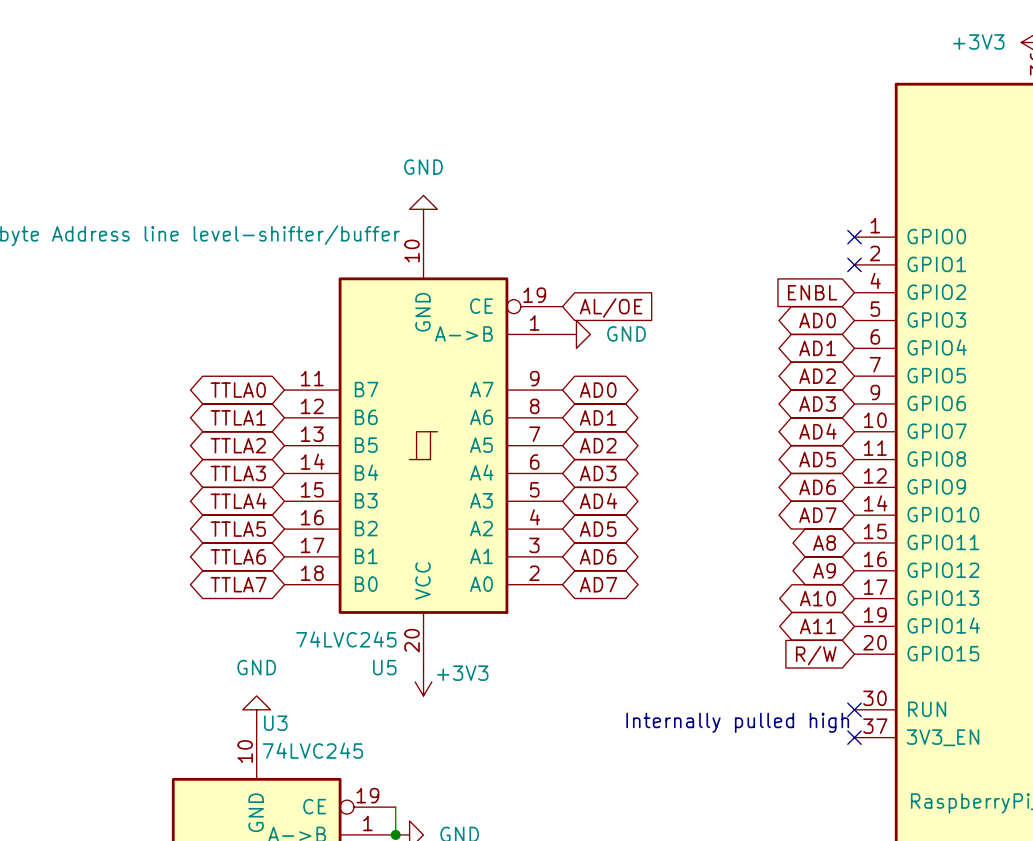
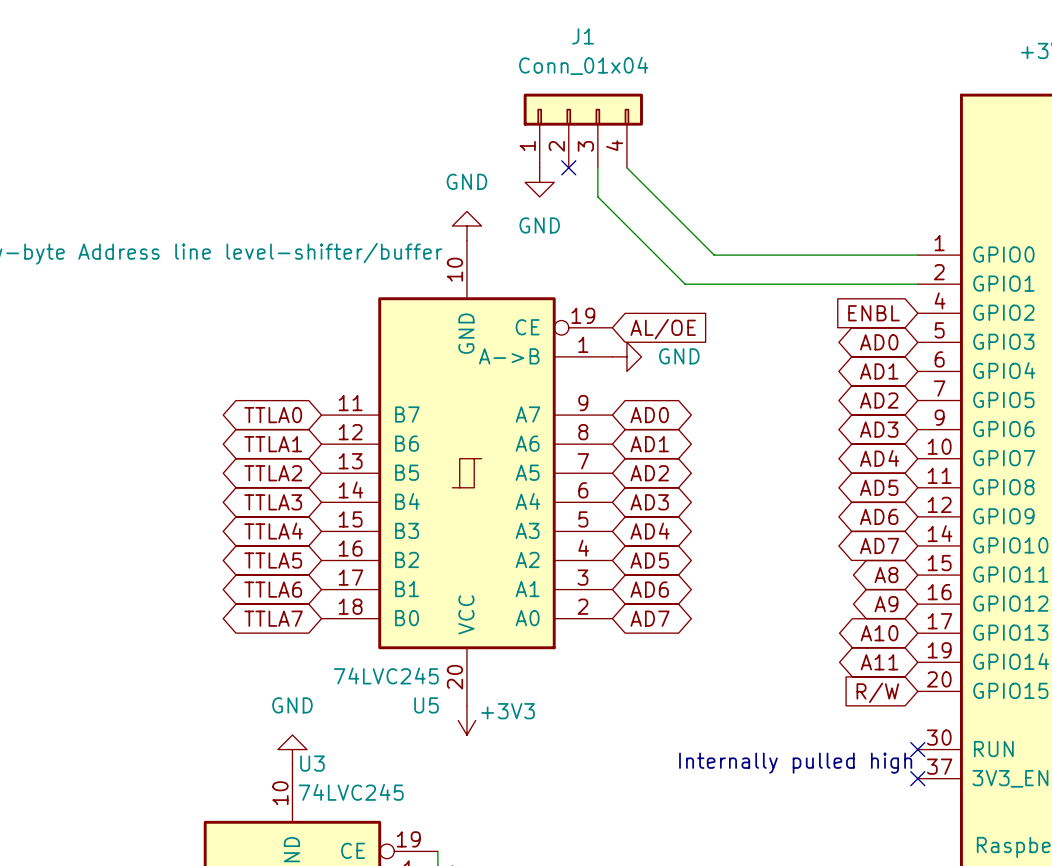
J1: none -> Conn_01x04 (583, 130)
no-connect mark: none -> (568, 167)
wire: none -> (597, 167) (597, 196) (685, 284) (917, 284)
wire: none -> (626, 167) (714, 255) (917, 255)
power symbol: none -> GND (539, 182)
no-connect mark: (854, 237) -> none
no-connect mark: (854, 264) -> none

